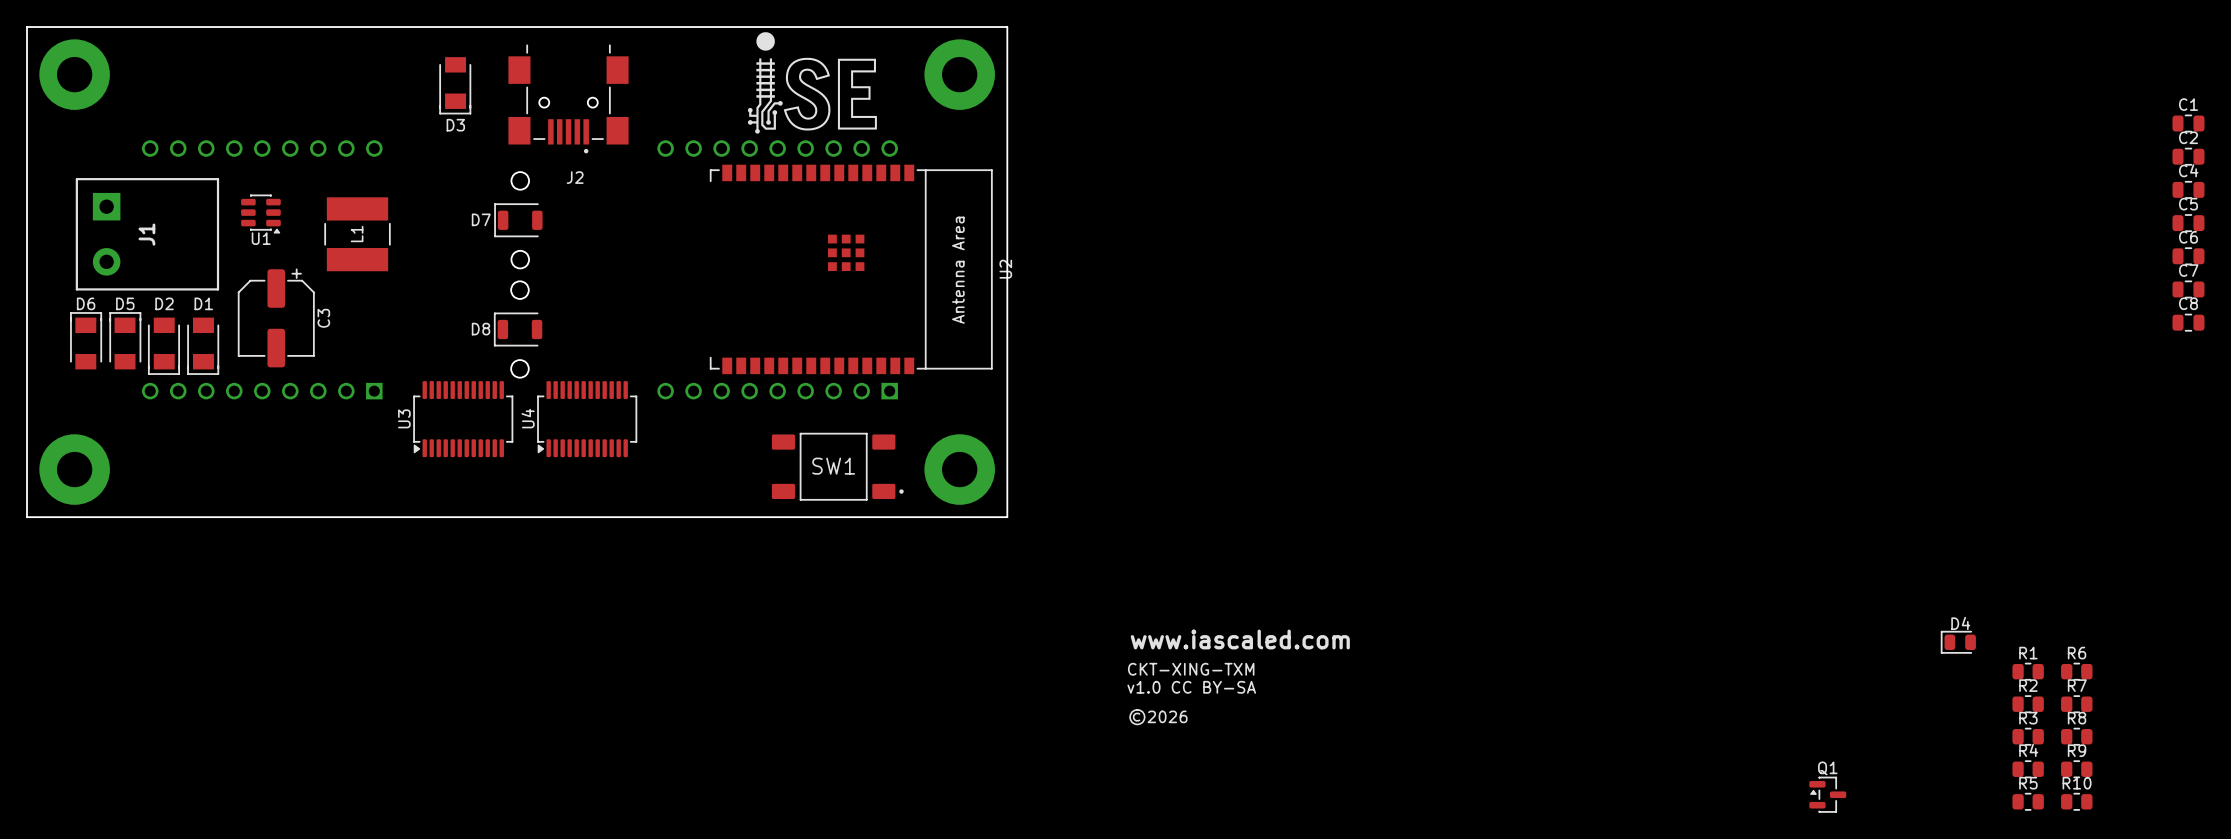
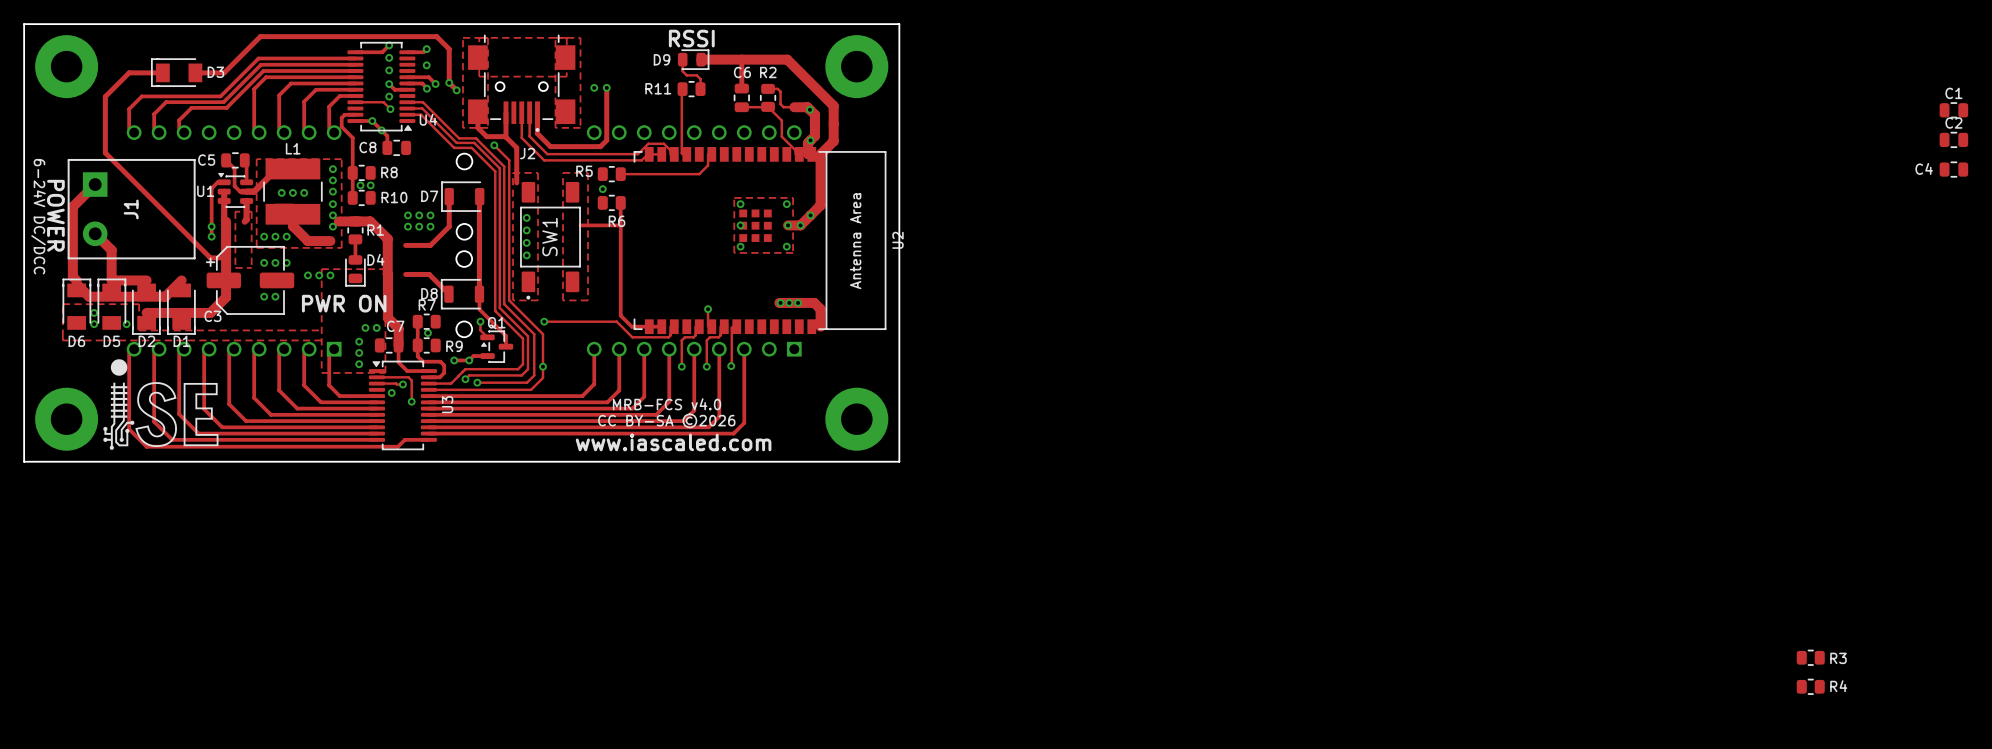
drawing: [747, 32, 877, 134] -> none
zone outline: none -> (479, 37) (479, 76) (566, 76) (566, 37)
zone outline: none -> (487, 37) (487, 127) (462, 127) (462, 37) (580, 37) (580, 127) (555, 127) (555, 37)
text: none -> RSSI (691, 38)
track: none -> (389, 45) (382, 52) (355, 52)
via: none -> (389, 45)
track: none -> (426, 49) (423, 52) (407, 52)
via: none -> (426, 49)
via: none -> (389, 57)
track: none -> (355, 58) (258, 58) (220, 96) (141, 96) (129, 109) (129, 132)
track: none -> (682, 59) (682, 71) (686, 75) (696, 75) (700, 79) (700, 89)
D9: none -> (693, 59)
track: none -> (701, 59) (787, 59) (833, 105) (833, 141) (820, 154) (820, 205) (800, 225) (788, 225)
track: none -> (741, 59) (741, 88)
track: none -> (355, 64) (261, 64) (223, 102) (166, 102) (154, 114) (154, 132)
via: none -> (426, 65)
via: none -> (389, 70)
track: none -> (355, 71) (263, 71) (226, 107) (191, 107) (179, 120) (179, 132)
track: none -> (162, 72) (129, 72) (105, 96) (105, 152) (210, 257) (226, 257)
track: none -> (195, 72) (224, 72) (260, 36) (436, 36) (449, 49) (449, 82) (456, 90)
D3 rotation: 0° (455, 85) -> 90° clockwise (176, 72)
D3 position: (455, 85) -> (176, 72)
track: none -> (355, 77) (266, 77) (254, 89) (254, 132)
track: none -> (407, 77) (428, 77) (435, 84)
via: none -> (449, 82)
track: none -> (355, 83) (291, 83) (279, 95) (279, 132)
track: none -> (407, 83) (422, 83) (426, 88)
track: none -> (389, 84) (394, 89) (407, 89)
via: none -> (389, 84)
via: none -> (435, 84)
track: none -> (606, 86) (606, 140) (600, 146) (550, 146) (537, 133) (537, 112)
J2 position: (568, 98) -> (521, 83)
via: none -> (594, 87)
via: none -> (606, 87)
via: none -> (426, 88)
track: none -> (682, 89) (683, 154)
R11: none -> (691, 89)
track: none -> (768, 88) (777, 88) (780, 91) (780, 104) (783, 107) (807, 107) (814, 114) (814, 135) (808, 142) (808, 154)
track: none -> (355, 89) (316, 89) (304, 101) (304, 132)
via: none -> (456, 90)
track: none -> (355, 96) (339, 96) (329, 106) (329, 132)
via: none -> (389, 96)
track: none -> (355, 102) (383, 102) (390, 109)
track: none -> (407, 102) (422, 102) (459, 138) (476, 138) (504, 166) (504, 304) (534, 334) (534, 375) (527, 382) (477, 382)
track: none -> (741, 107) (768, 106) (781, 120) (781, 136) (795, 150) (795, 154)
track: none -> (407, 108) (422, 108) (456, 142) (474, 142) (499, 168) (499, 307) (527, 336) (527, 369) (521, 375) (469, 375) (466, 380) (465, 379)
via: none -> (390, 109)
via: none -> (809, 109)
D3 name position: D3 (455, 125) -> D3 (215, 72)
track: none -> (478, 112) (477, 127) (486, 136) (505, 136) (516, 147) (516, 182)
track: none -> (505, 112) (505, 137)
track: none -> (521, 112) (521, 137) (544, 160) (641, 160) (647, 154) (658, 154)
track: none -> (529, 112) (529, 136) (547, 154) (638, 154) (648, 143) (663, 143) (670, 150) (670, 154)
track: none -> (355, 114) (344, 114) (341, 117) (341, 126) (352, 137) (352, 197)
track: none -> (407, 114) (421, 114) (454, 147) (471, 147) (495, 171) (495, 310) (522, 338) (522, 364) (517, 369) (465, 369) (462, 372)
track: none -> (355, 121) (372, 121) (387, 136) (387, 147)
via: none -> (372, 121)
via: none -> (381, 130)
via: none -> (810, 140)
track: none -> (494, 145) (509, 160) (509, 300) (543, 334) (543, 377) (531, 389) (428, 389)
via: none -> (494, 145)
C4 name position: C4 (2188, 170) -> C4 (1924, 168)
track: none -> (708, 154) (708, 165) (699, 174) (620, 174)
zone outline: none -> (256, 159) (256, 247) (341, 247) (341, 159) (256, 159)
track: none -> (226, 160) (234, 168) (234, 186) (240, 191) (254, 191) (276, 169) (292, 169)
track: none -> (244, 160) (246, 162) (246, 182)
via: none -> (332, 169)
zone outline: none -> (512, 172) (537, 172) (537, 300) (512, 300) (512, 172)
zone outline: none -> (563, 172) (588, 172) (588, 300) (563, 300) (563, 172)
via: none -> (332, 180)
track: none -> (224, 182) (217, 182) (211, 188) (211, 236)
C5 name position: C5 (2188, 204) -> C5 (206, 160)
track: none -> (95, 184) (72, 206) (72, 276) (76, 280)
via: none -> (360, 185)
via: none -> (370, 185)
via: none -> (602, 189)
track: none -> (224, 191) (226, 297) (210, 312) (146, 312)
U1 rotation: 0° (260, 214) -> 180° (235, 190)
via: none -> (332, 191)
via: none -> (281, 192)
via: none -> (292, 192)
via: none -> (304, 192)
track: none -> (449, 196) (449, 226) (430, 245) (405, 245)
track: none -> (479, 196) (479, 309) (505, 335) (505, 346)
zone outline: none -> (734, 197) (793, 197) (793, 252) (734, 252) (734, 197)
C5 position: (2188, 223) -> (235, 160)
track: none -> (246, 201) (246, 219) (244, 221)
track: none -> (620, 202) (620, 315) (631, 326) (658, 326)
via: none -> (332, 204)
via: none -> (740, 204)
via: none -> (786, 204)
L1 position: (357, 234) -> (292, 191)
L1 name rotation: 0° (357, 234) -> 90° clockwise (293, 148)
L1 name position: L1 (357, 234) -> L1 (293, 148)
zone outline: none -> (235, 211) (251, 211) (251, 267) (235, 267) (235, 211)
U1 name position: U1 (261, 238) -> U1 (205, 191)
track: none -> (292, 214) (292, 226) (307, 241) (330, 241)
text: none -> POWER (55, 215)
via: none -> (332, 215)
via: none -> (407, 215)
via: none -> (419, 215)
via: none -> (430, 215)
via: none -> (810, 215)
text: none -> 6-24V DC/DCC (38, 216)
via: none -> (526, 217)
track: none -> (338, 221) (370, 221) (387, 238) (387, 317) (398, 328) (398, 362) (407, 371) (428, 371)
track: none -> (580, 225) (620, 225)
via: none -> (740, 225)
via: none -> (788, 225)
via: none -> (800, 225)
via: none -> (211, 226)
via: none -> (332, 226)
via: none -> (407, 226)
via: none -> (419, 226)
via: none -> (430, 226)
C6 rotation: 0° (2188, 256) -> 90° clockwise (741, 97)
C6 position: (2188, 256) -> (741, 97)
via: none -> (526, 230)
track: none -> (95, 233) (111, 250) (111, 280) (146, 280)
via: none -> (211, 236)
via: none -> (264, 236)
via: none -> (275, 236)
via: none -> (286, 236)
track: none -> (355, 239) (355, 259)
C7 name position: C7 (2188, 270) -> C7 (395, 326)
via: none -> (526, 242)
via: none -> (740, 246)
via: none -> (786, 246)
via: none -> (526, 255)
C7 position: (2188, 289) -> (389, 345)
via: none -> (264, 262)
via: none -> (275, 262)
via: none -> (286, 262)
zone outline: none -> (321, 269) (321, 372) (385, 372) (385, 269) (321, 269)
D6 name position: D6 (86, 303) -> D6 (76, 341)
D5 name position: D5 (125, 303) -> D5 (111, 341)
D2 name position: D2 (164, 303) -> D2 (146, 341)
D1 name position: D1 (203, 303) -> D1 (181, 341)
C8 name position: C8 (2188, 303) -> C8 (367, 147)
track: none -> (405, 274) (429, 274) (449, 293)
via: none -> (307, 275)
via: none -> (319, 275)
via: none -> (330, 275)
track: none -> (181, 280) (165, 296) (89, 296) (76, 284)
C3 rotation: 0° (276, 318) -> 90° counterclockwise (250, 280)
C3 name position: C3 (323, 318) -> C3 (212, 316)
C8 position: (2188, 322) -> (396, 147)
via: none -> (264, 296)
via: none -> (275, 296)
track: none -> (779, 302) (814, 302) (820, 309) (820, 326)
via: none -> (780, 302)
via: none -> (789, 302)
via: none -> (798, 302)
text: none -> PWR ON (344, 303)
track: none -> (708, 309) (708, 326)
via: none -> (708, 309)
via: none -> (94, 312)
track: none -> (417, 321) (417, 356) (422, 361) (440, 361) (444, 365) (444, 372) (439, 377) (428, 377)
track: none -> (480, 321) (480, 330) (487, 337)
via: none -> (480, 321)
track: none -> (544, 321) (616, 321) (632, 337) (668, 337) (670, 335) (670, 326)
via: none -> (544, 321)
via: none -> (94, 324)
via: none -> (126, 324)
track: none -> (695, 326) (695, 335) (693, 337) (684, 337) (681, 340) (681, 366)
track: none -> (720, 326) (720, 335) (718, 337) (709, 337) (706, 340) (706, 366)
track: none -> (733, 326) (731, 366)
via: none -> (365, 327)
via: none -> (376, 327)
zone outline: none -> (321, 330) (139, 330) (139, 304) (62, 304) (62, 340) (321, 340)
via: none -> (427, 332)
via: none -> (359, 341)
track: none -> (129, 349) (129, 429) (146, 446) (397, 446) (404, 439) (428, 439)
track: none -> (154, 349) (154, 421) (172, 439) (376, 439)
track: none -> (179, 349) (179, 414) (198, 433) (376, 433)
track: none -> (204, 349) (204, 409) (222, 427) (376, 427)
track: none -> (229, 349) (229, 404) (246, 421) (376, 421)
track: none -> (254, 349) (254, 397) (271, 414) (376, 414)
track: none -> (304, 349) (304, 385) (321, 402) (376, 402)
track: none -> (329, 349) (329, 385) (339, 396) (376, 396)
track: none -> (594, 349) (594, 384) (582, 396) (428, 396)
track: none -> (619, 349) (619, 390) (607, 402) (428, 402)
track: none -> (644, 349) (644, 396) (632, 408) (428, 408)
track: none -> (669, 349) (669, 401) (656, 414) (428, 414)
track: none -> (694, 349) (694, 410) (683, 421) (428, 421)
track: none -> (719, 349) (719, 416) (708, 427) (428, 427)
track: none -> (744, 349) (744, 422) (733, 433) (428, 433)
track: none -> (279, 350) (279, 390) (297, 408) (376, 408)
via: none -> (359, 352)
track: none -> (487, 356) (473, 356) (469, 360) (454, 360)
drawing: none -> [103, 359, 219, 450]
via: none -> (454, 360)
via: none -> (469, 360)
via: none -> (359, 364)
via: none -> (543, 366)
via: none -> (681, 366)
via: none -> (706, 366)
via: none -> (731, 366)
track: none -> (462, 372) (458, 376)
U3 name position: U3 (404, 418) -> U3 (447, 404)
U4 name position: U4 (528, 418) -> U4 (428, 119)
U3 rotation: 0° (463, 419) -> 90° clockwise (402, 405)
U4 rotation: 0° (587, 419) -> 90° counterclockwise (381, 86)
U4 position: (587, 419) -> (381, 86)
track: none -> (458, 376) (451, 383) (428, 383)
track: none -> (376, 377) (408, 377) (411, 380) (411, 401)
via: none -> (465, 379)
via: none -> (477, 382)
track: none -> (376, 383) (402, 384)
via: none -> (402, 384)
via: none -> (391, 392)
via: none -> (411, 401)
text: none -> MRB-FCS v4.0 (667, 404)
SW1 rotation: 0° (837, 466) -> 90° clockwise (550, 240)
SW1 position: (837, 466) -> (550, 240)
text: none -> CC BY-SA ©2026 (666, 420)
text: none -> www.iascaled.com (673, 442)
text: www.iascaled.com (1240, 639) -> none
D4 rotation: 0° (1958, 642) -> 90° counterclockwise (355, 270)
D4 position: (1958, 642) -> (355, 270)
R6 name position: R6 (2077, 653) -> R6 (617, 221)
text: CKT-XING-TXM (1191, 669) -> none
R1 rotation: 0° (2028, 671) -> 90° clockwise (355, 230)
R1 position: (2028, 671) -> (355, 230)
R6 position: (2076, 671) -> (611, 202)
text: v1.0 CC BY-SA (1191, 687) -> none
R2 rotation: 0° (2028, 704) -> 90° clockwise (768, 97)
R2 position: (2028, 704) -> (768, 97)
R7 position: (2076, 704) -> (426, 321)
text: ©2026 (1158, 717) -> none
R3 name position: R3 (2028, 718) -> R3 (1838, 658)
R8 name position: R8 (2077, 718) -> R8 (389, 172)
R8 position: (2076, 736) -> (361, 172)
R4 name position: R4 (2028, 750) -> R4 (1838, 686)
R9 name position: R9 (2077, 750) -> R9 (454, 346)
R9 position: (2076, 769) -> (426, 345)
R5 name position: R5 (2028, 783) -> R5 (584, 171)
R10 name position: R10 (2077, 783) -> R10 (394, 197)
Q1 position: (1827, 794) -> (496, 346)
R5 position: (2028, 801) -> (611, 174)
R10 position: (2076, 801) -> (361, 197)

